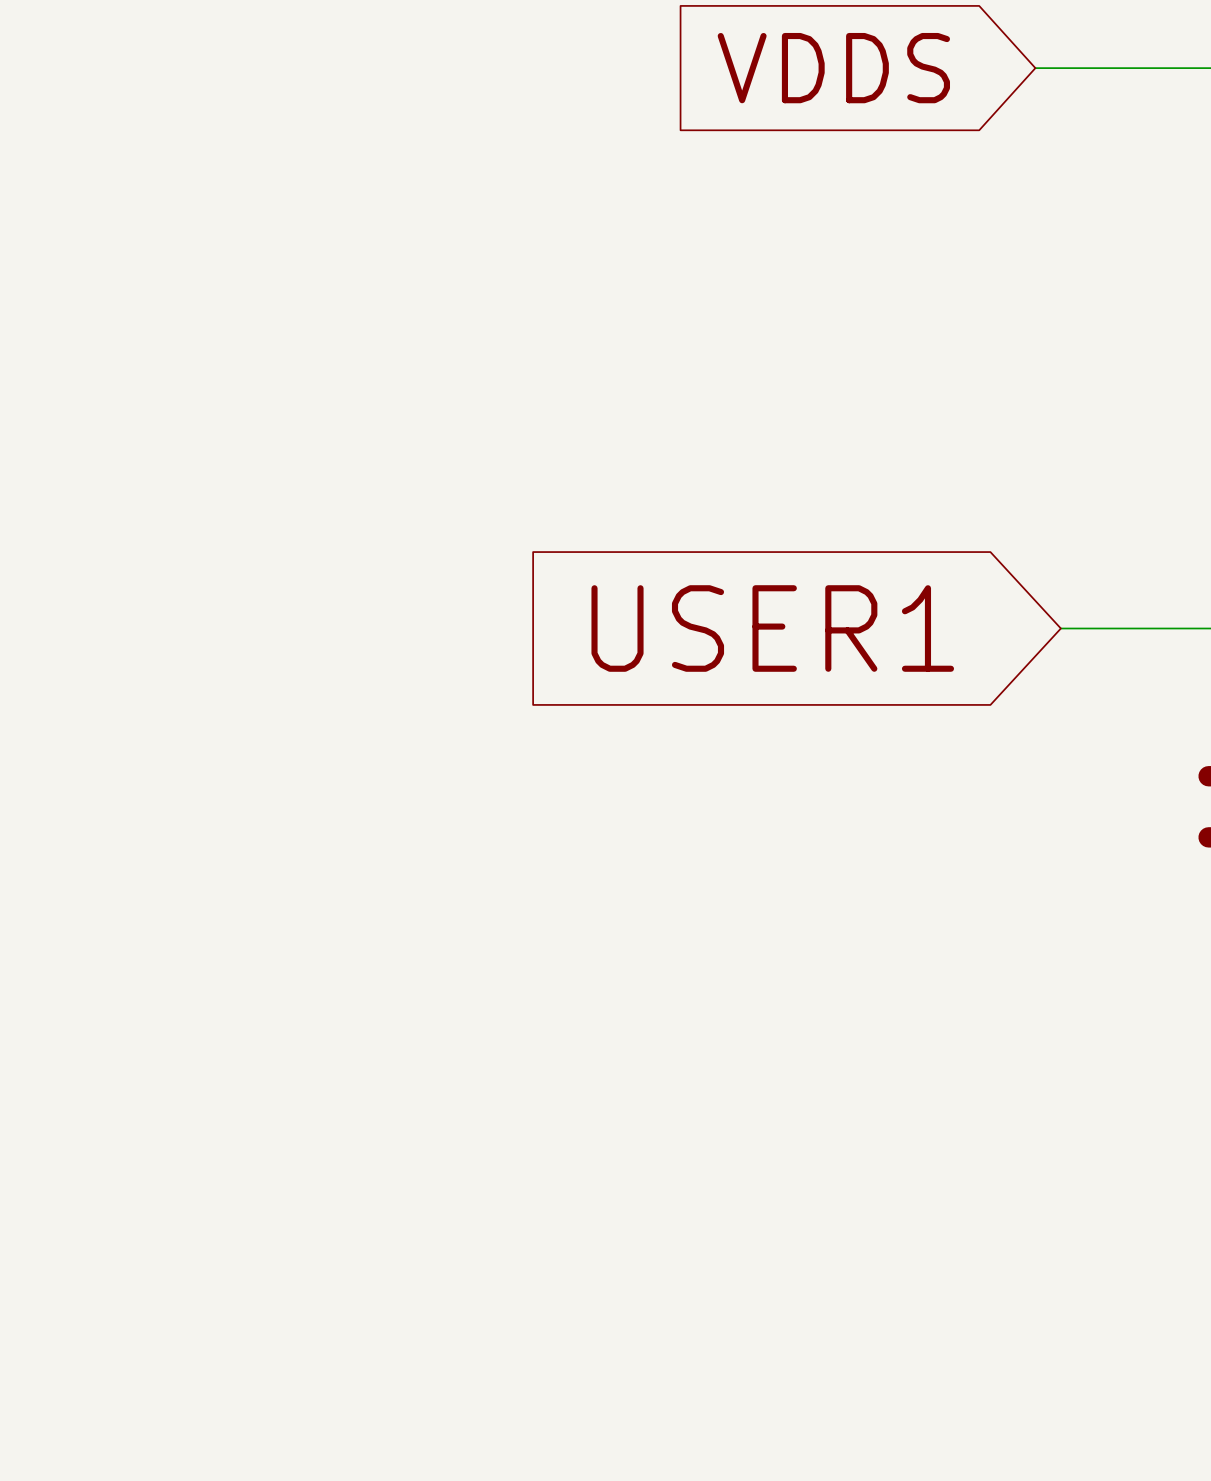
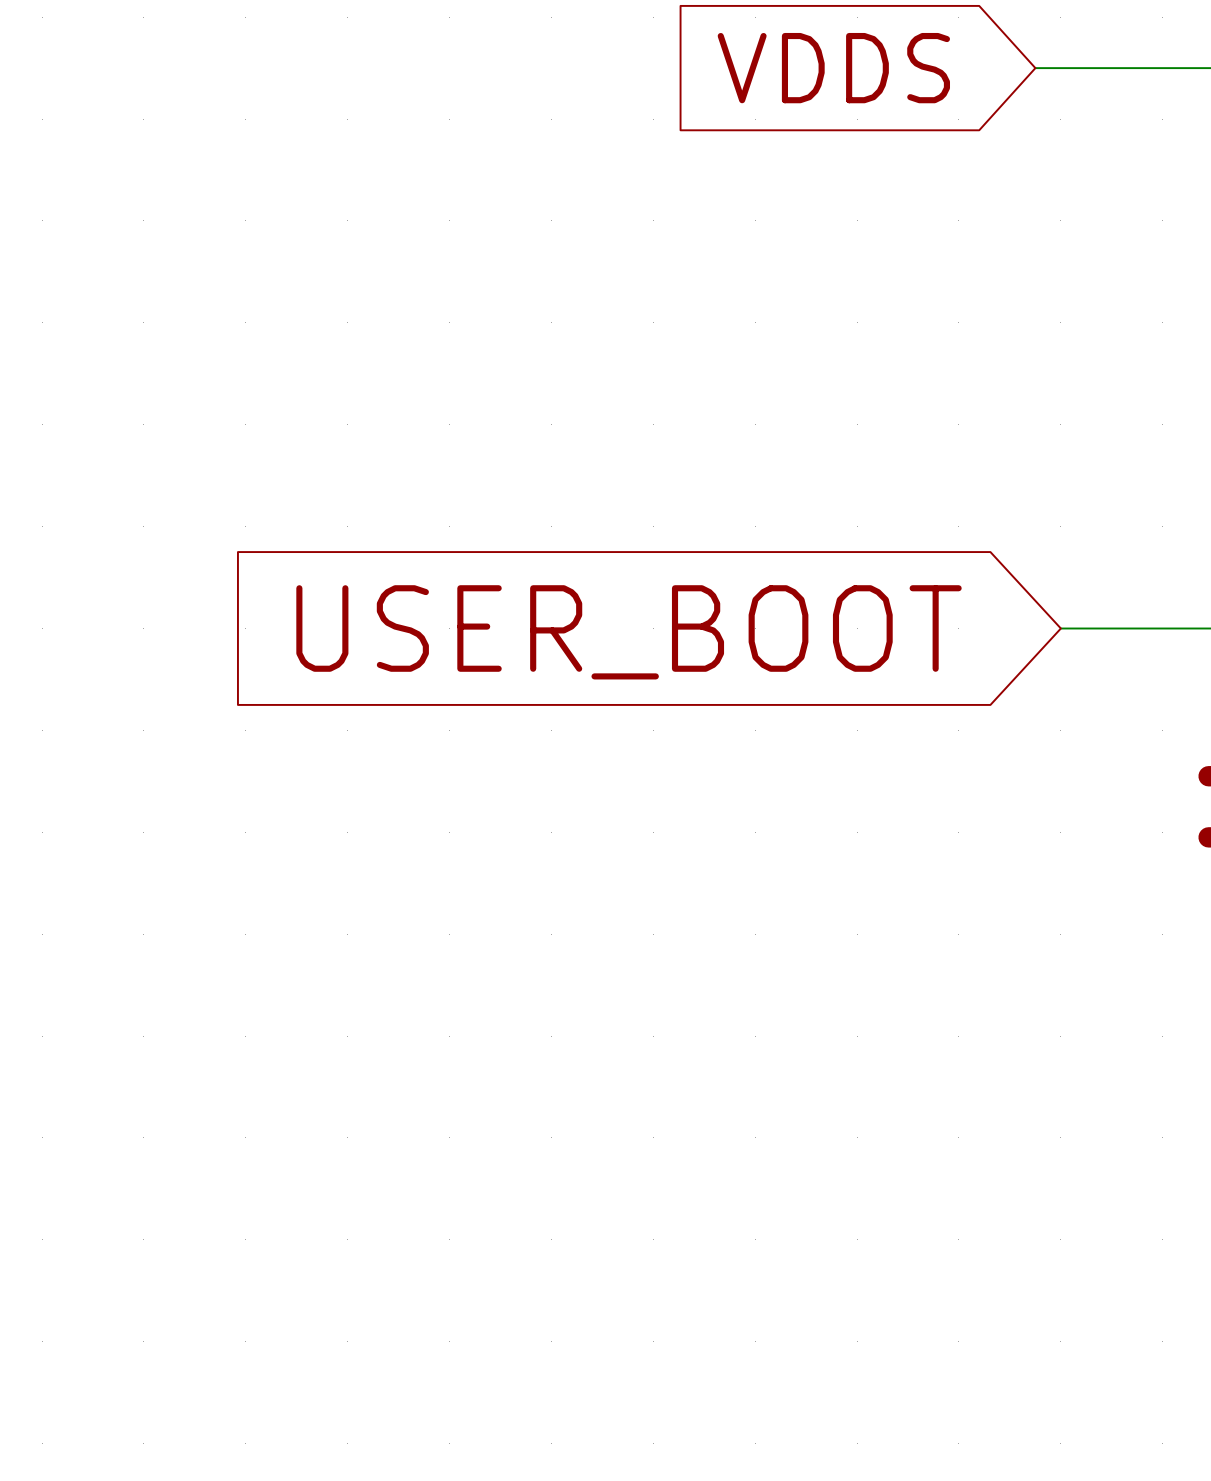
global label: USER1 (772, 628) -> USER_BOOT (629, 632)

